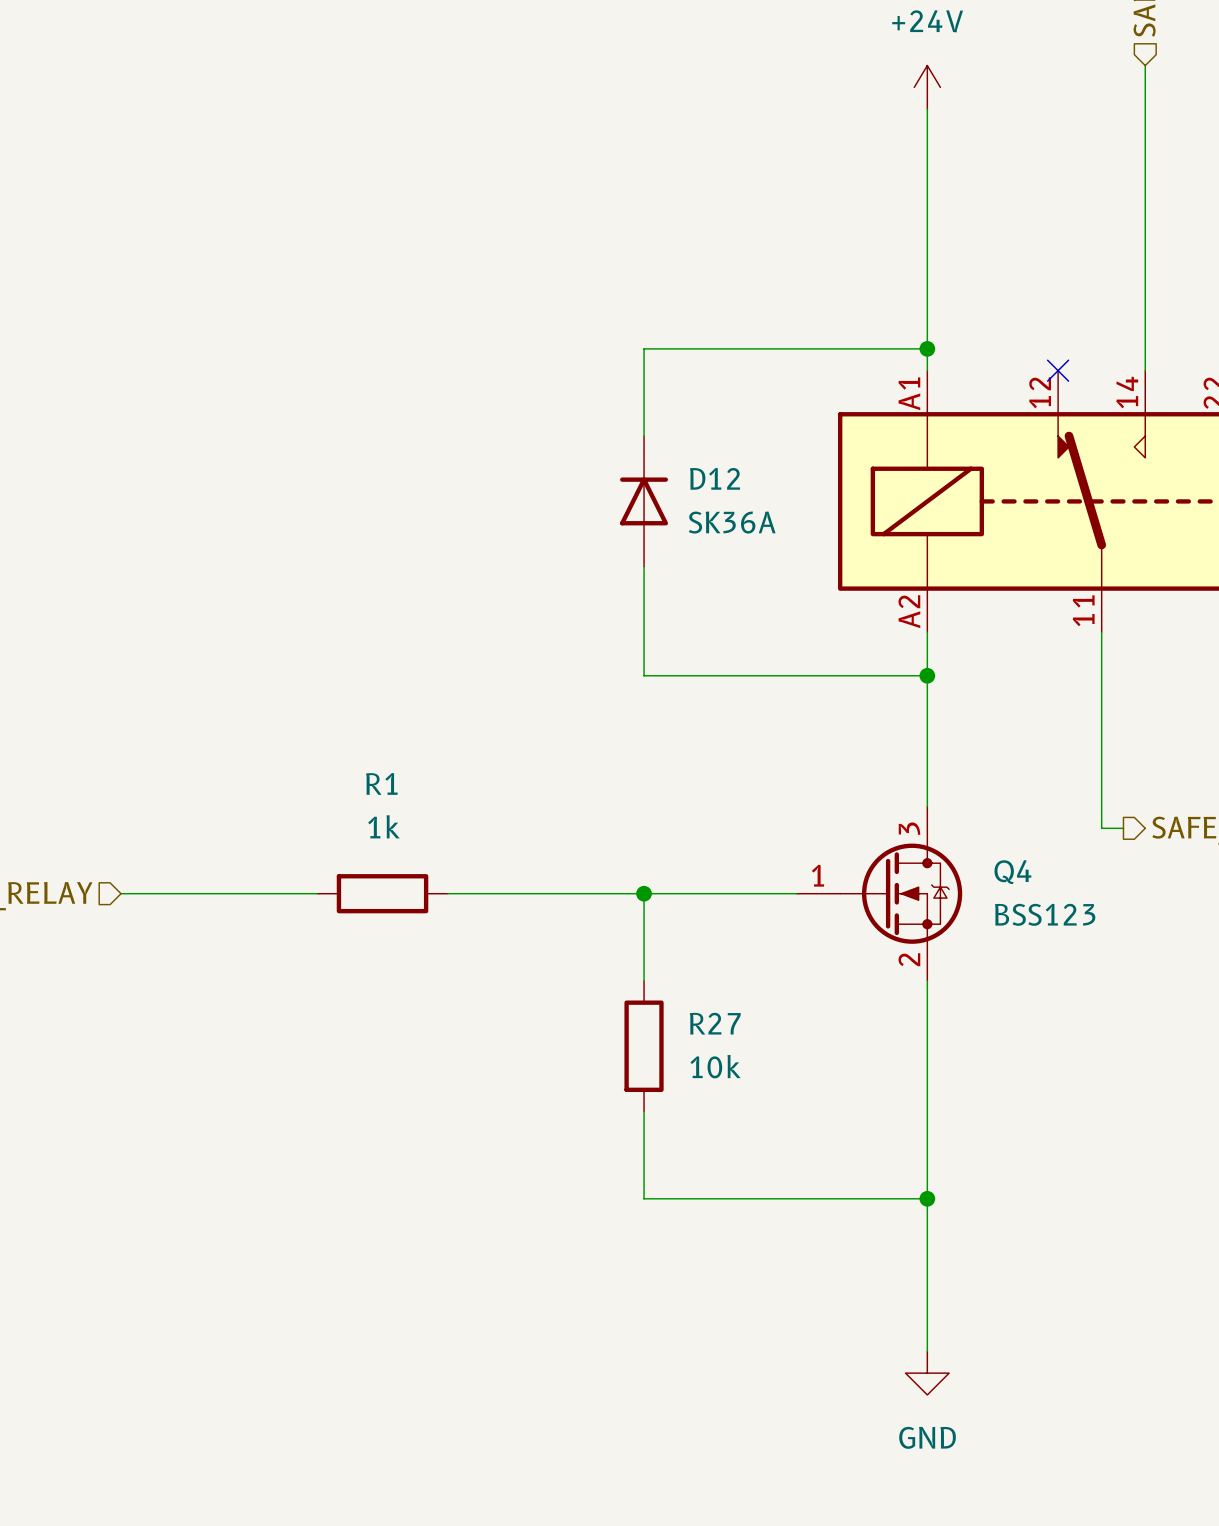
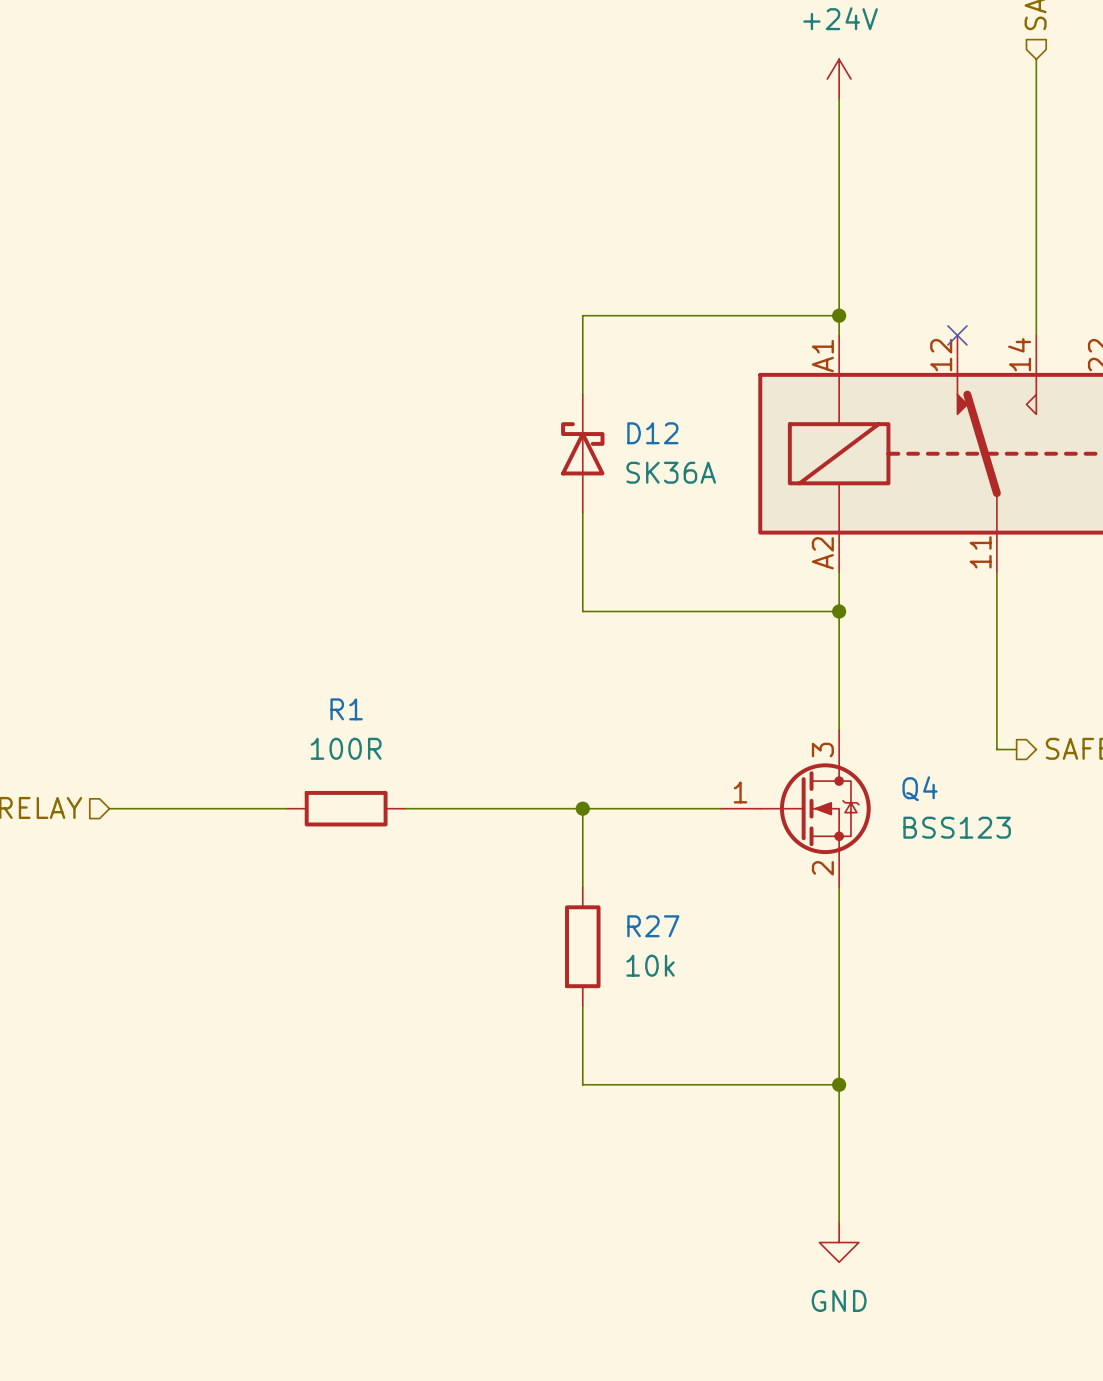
D12 symbol: [620, 436, 669, 567] -> [561, 394, 605, 513]
R1 value: 1k (383, 826) -> 100R (346, 748)

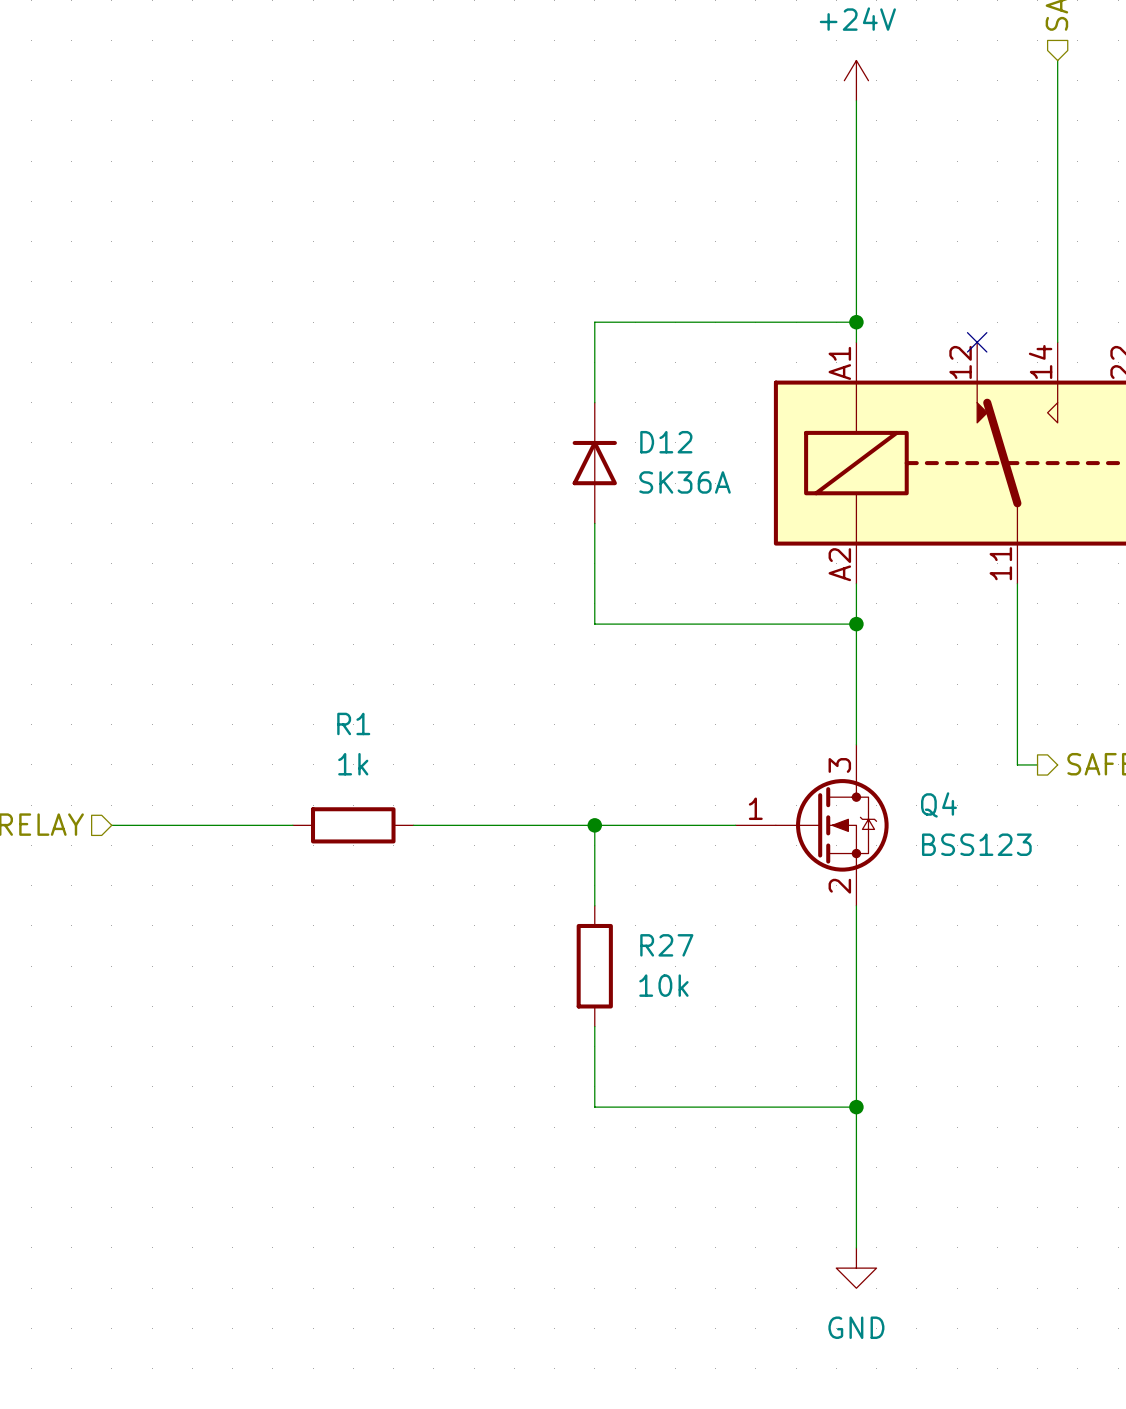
D12 symbol: [561, 394, 605, 513] -> [572, 402, 617, 524]
R1 value: 100R (346, 748) -> 1k (353, 764)

